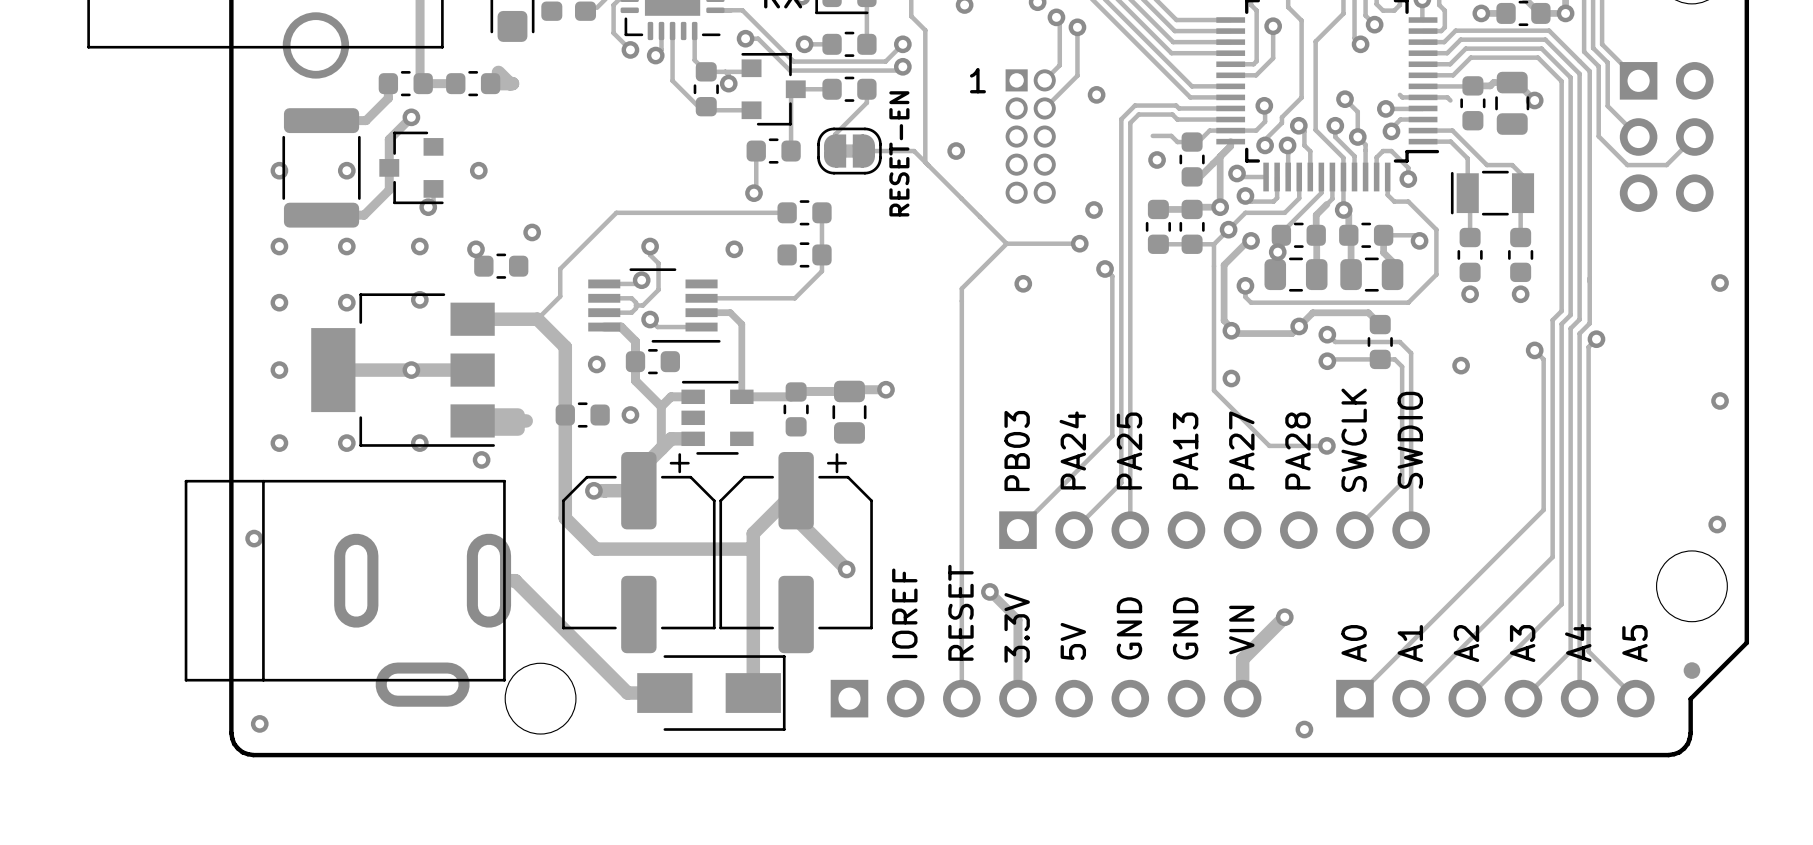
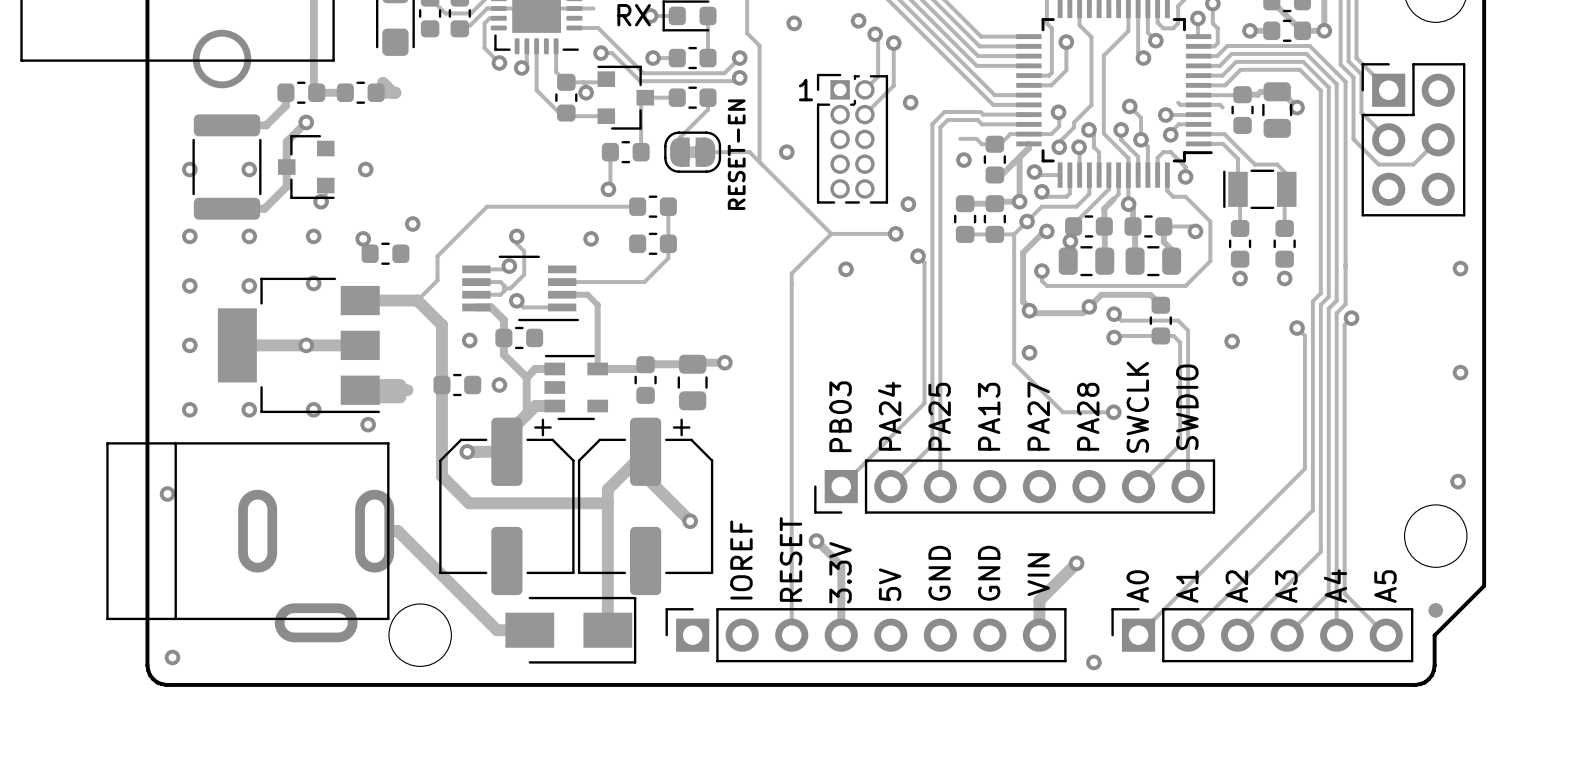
part footprint: [1619, 62, 1714, 212] -> [1361, 63, 1466, 217]
part footprint: [1005, 69, 1056, 204] -> [816, 73, 889, 204]
part footprint: [999, 511, 1430, 549] -> [814, 459, 1216, 514]
part footprint: [830, 679, 1262, 718] -> [665, 608, 1067, 663]
part footprint: [1336, 679, 1655, 718] -> [1111, 608, 1414, 663]

